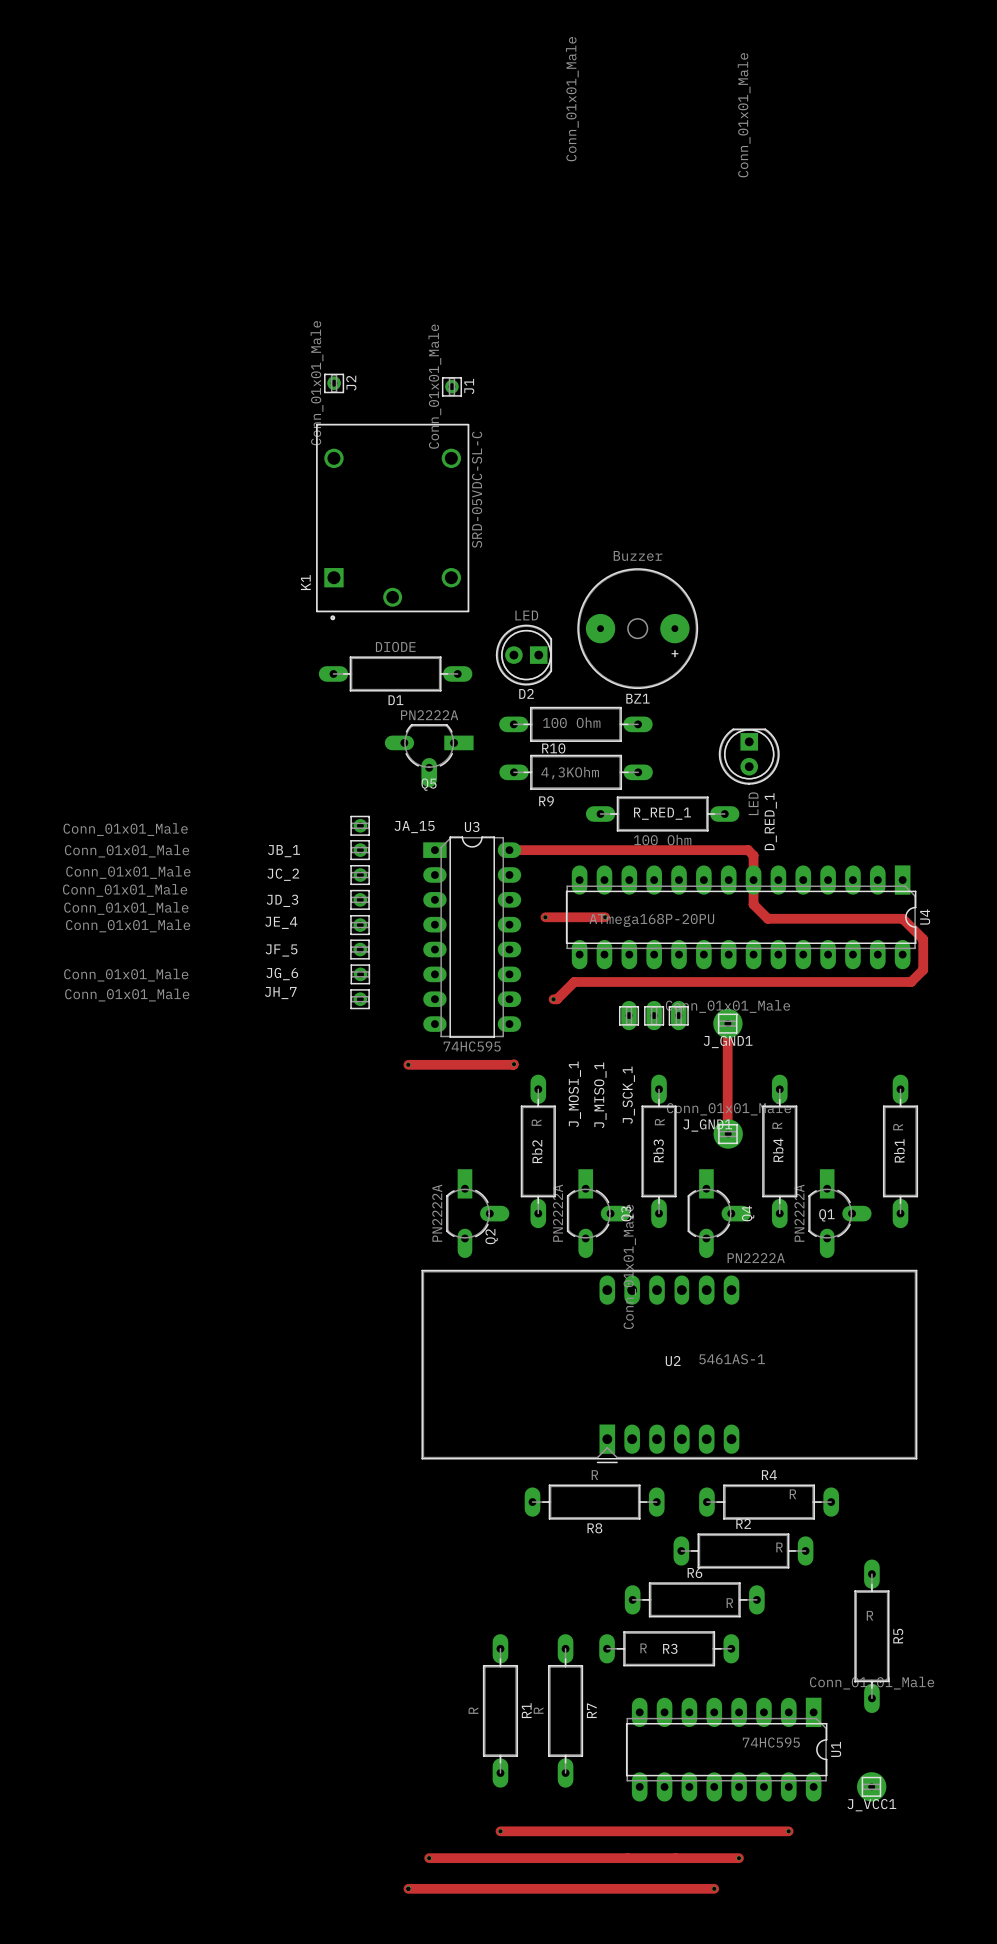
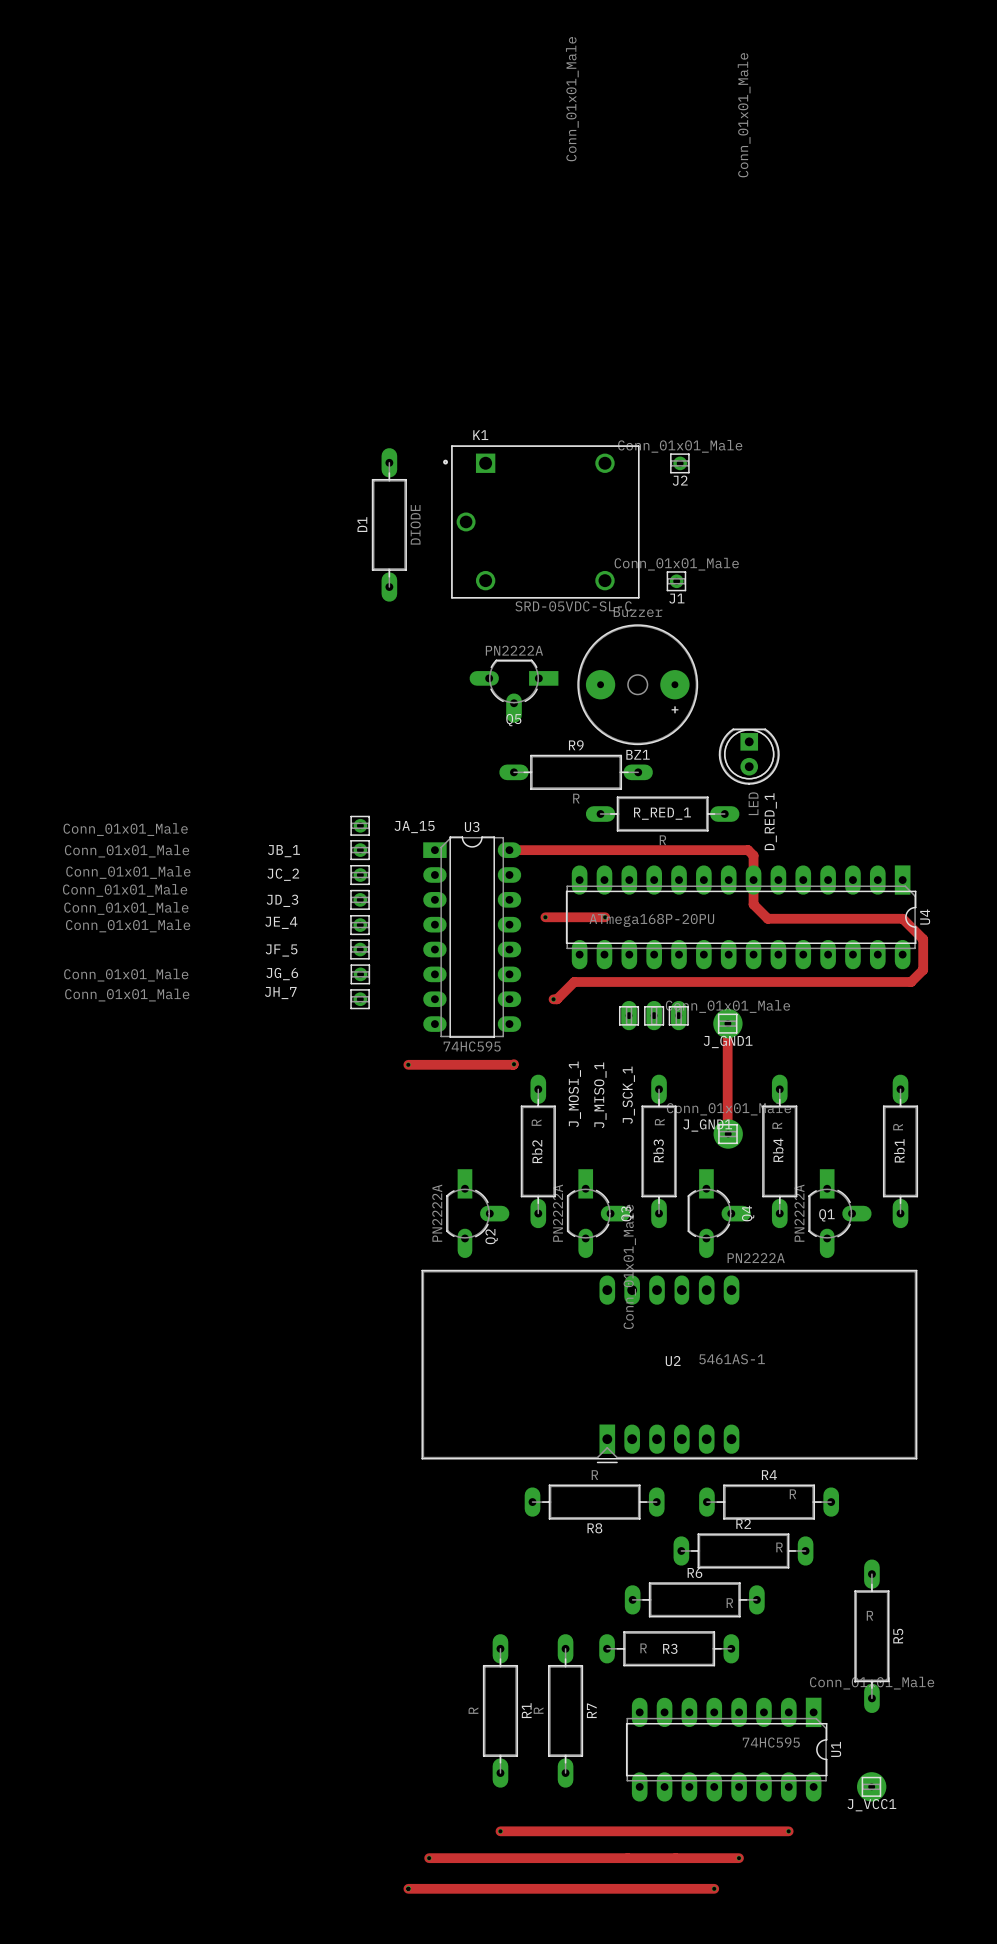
J2 rotation: 0° (334, 383) -> 90° clockwise (679, 463)
J2 position: (334, 383) -> (679, 463)
J1 rotation: 0° (451, 386) -> 90° clockwise (676, 581)
J1 position: (451, 386) -> (676, 581)
K1 rotation: 0° (392, 522) -> 90° clockwise (541, 521)
K1 position: (392, 522) -> (541, 521)
BZ1 position: (637, 628) -> (637, 684)
D2: LED (523, 655) -> none
D1 rotation: 0° (395, 673) -> 90° clockwise (389, 524)
D1 position: (395, 673) -> (389, 524)
R10: 100 Ohm (575, 724) -> none
Q5 position: (429, 755) -> (514, 691)
R9 value: 4,3KOhm (570, 773) -> R (576, 798)
R9 name position: R9 (546, 801) -> R9 (576, 745)
R_RED_1 value: 100 Ohm (662, 840) -> R (662, 840)

